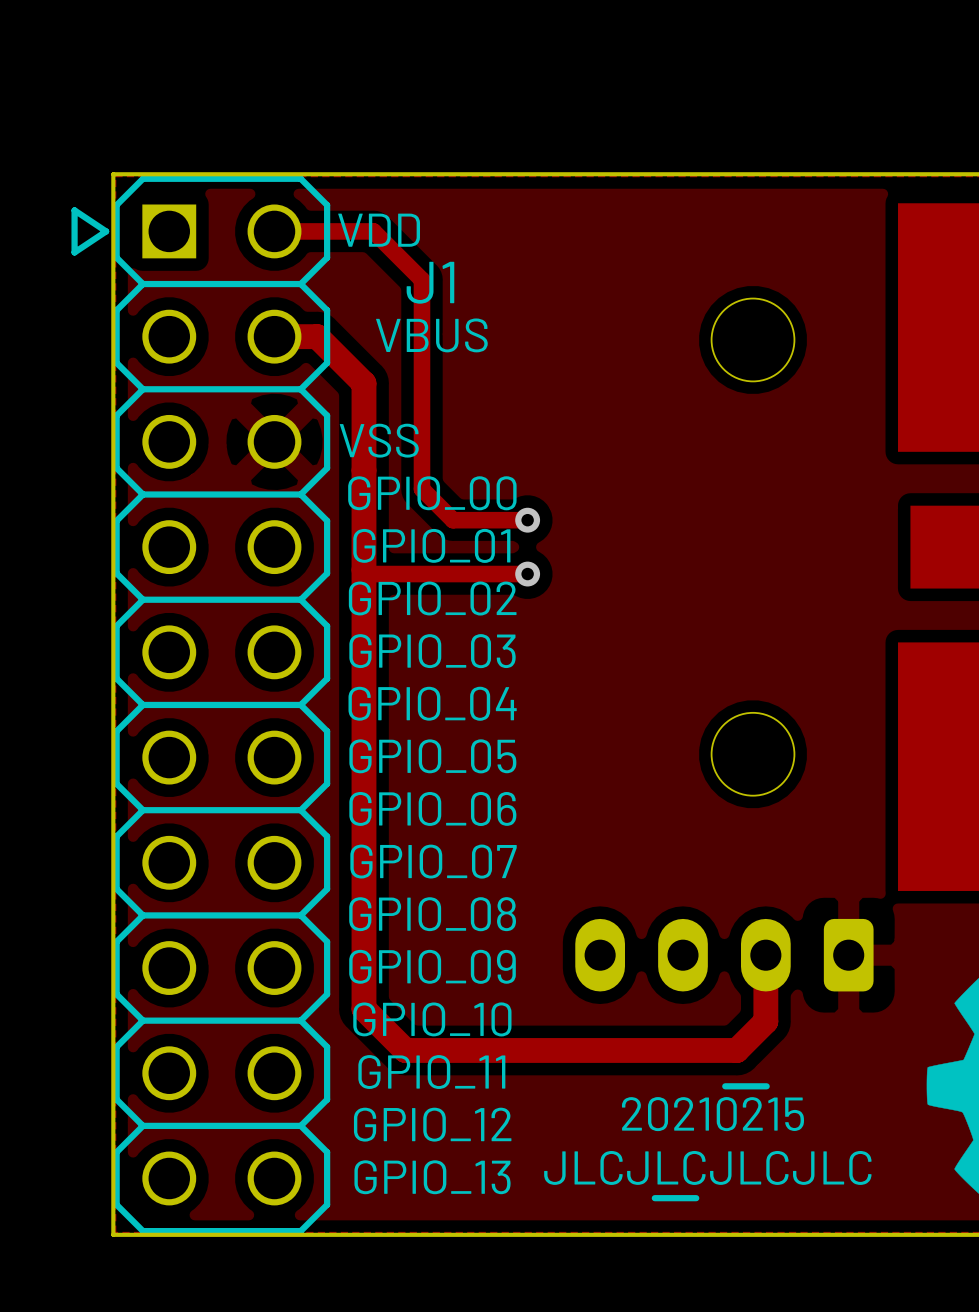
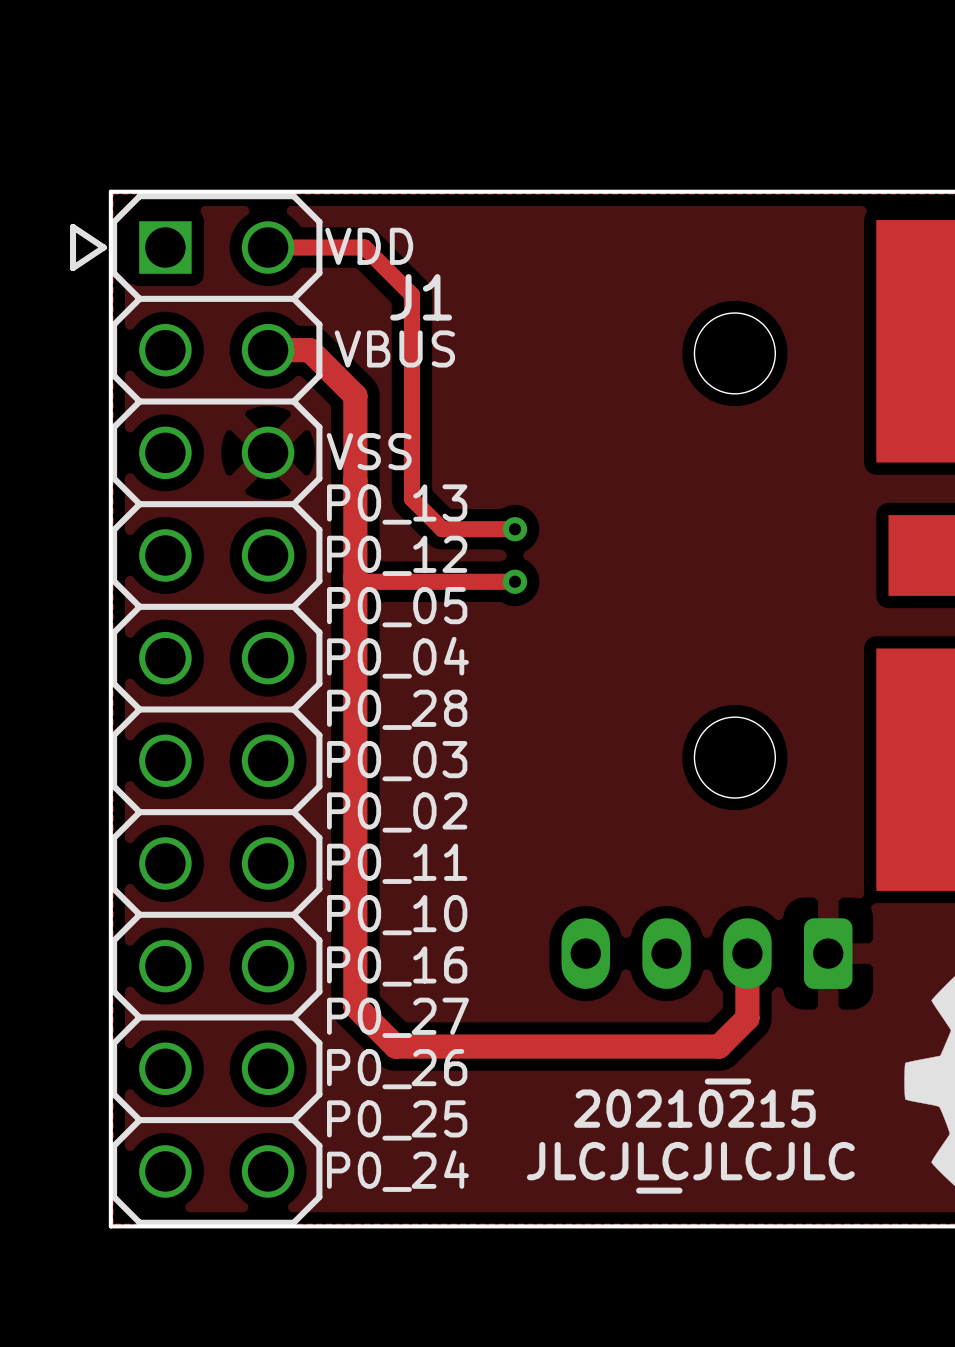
J1 footprint: [71, 175, 331, 1235] -> [69, 193, 323, 1226]

